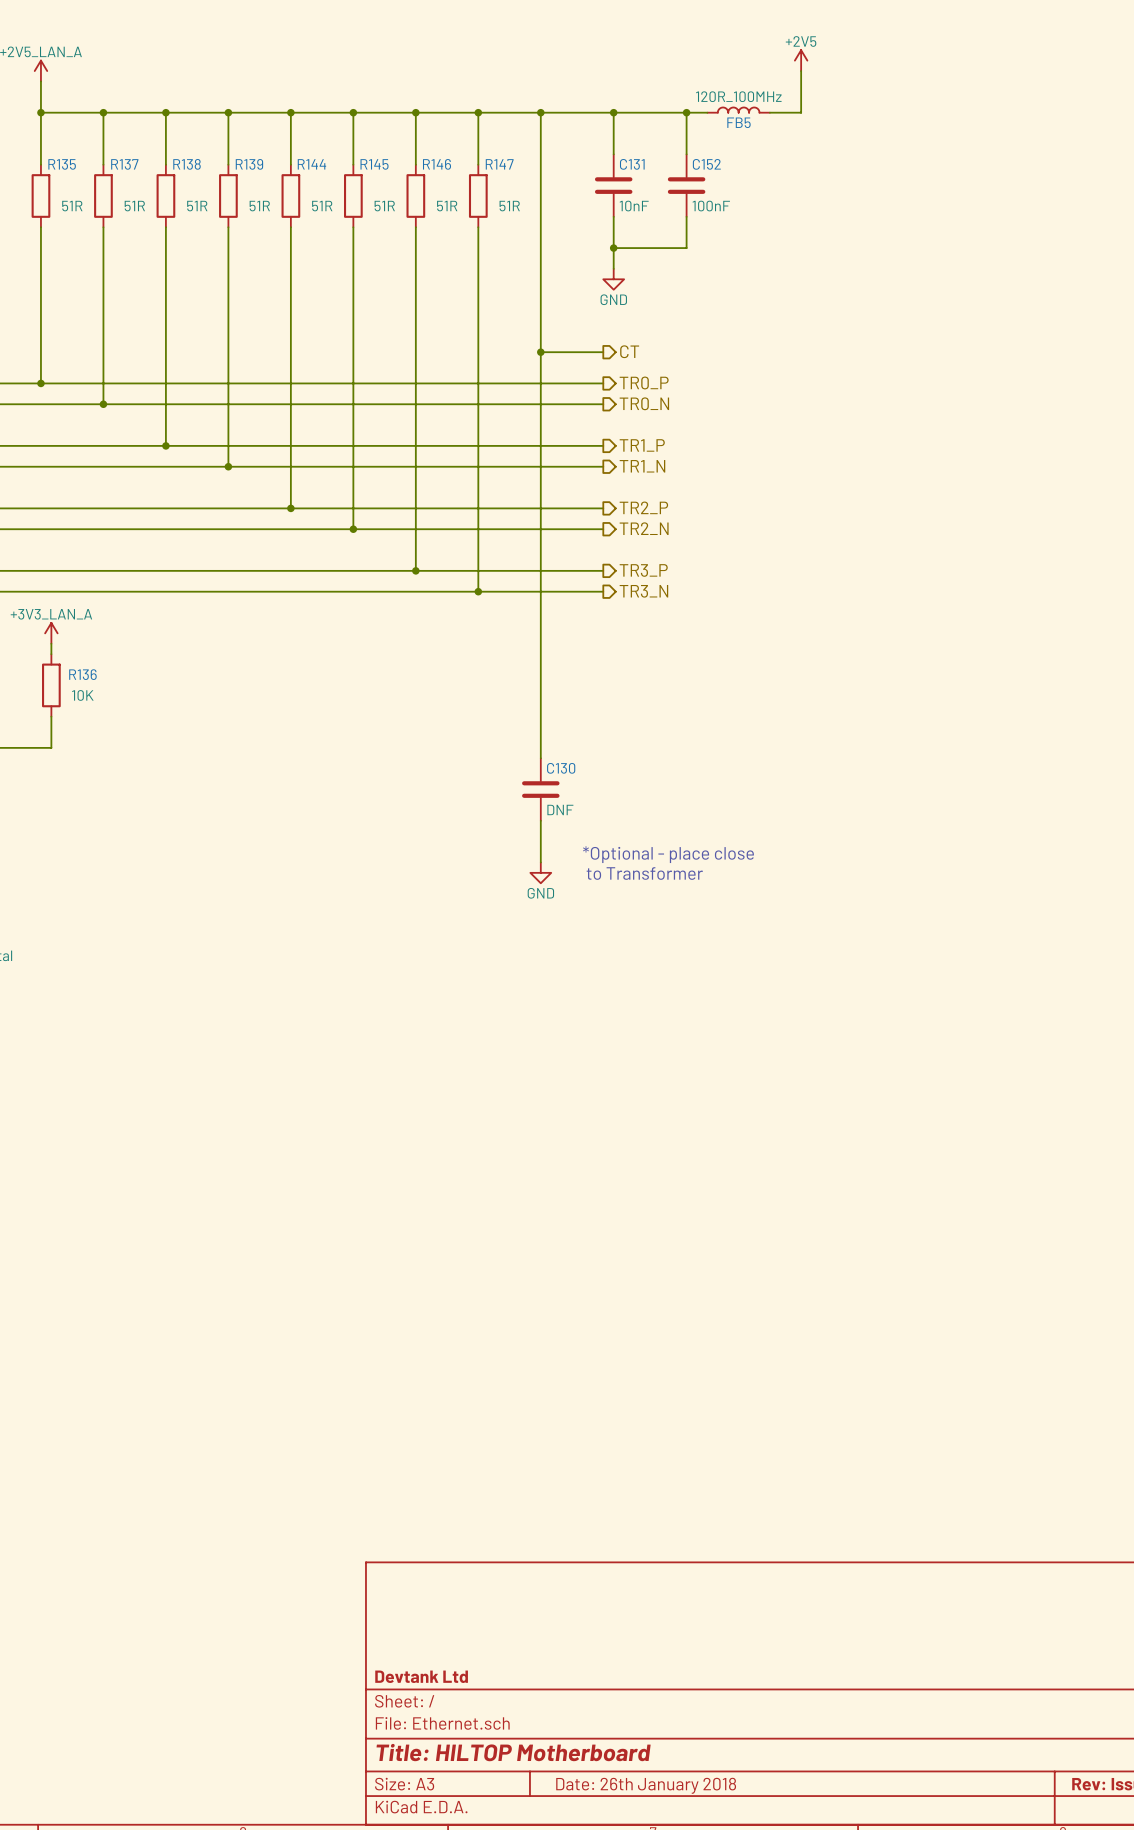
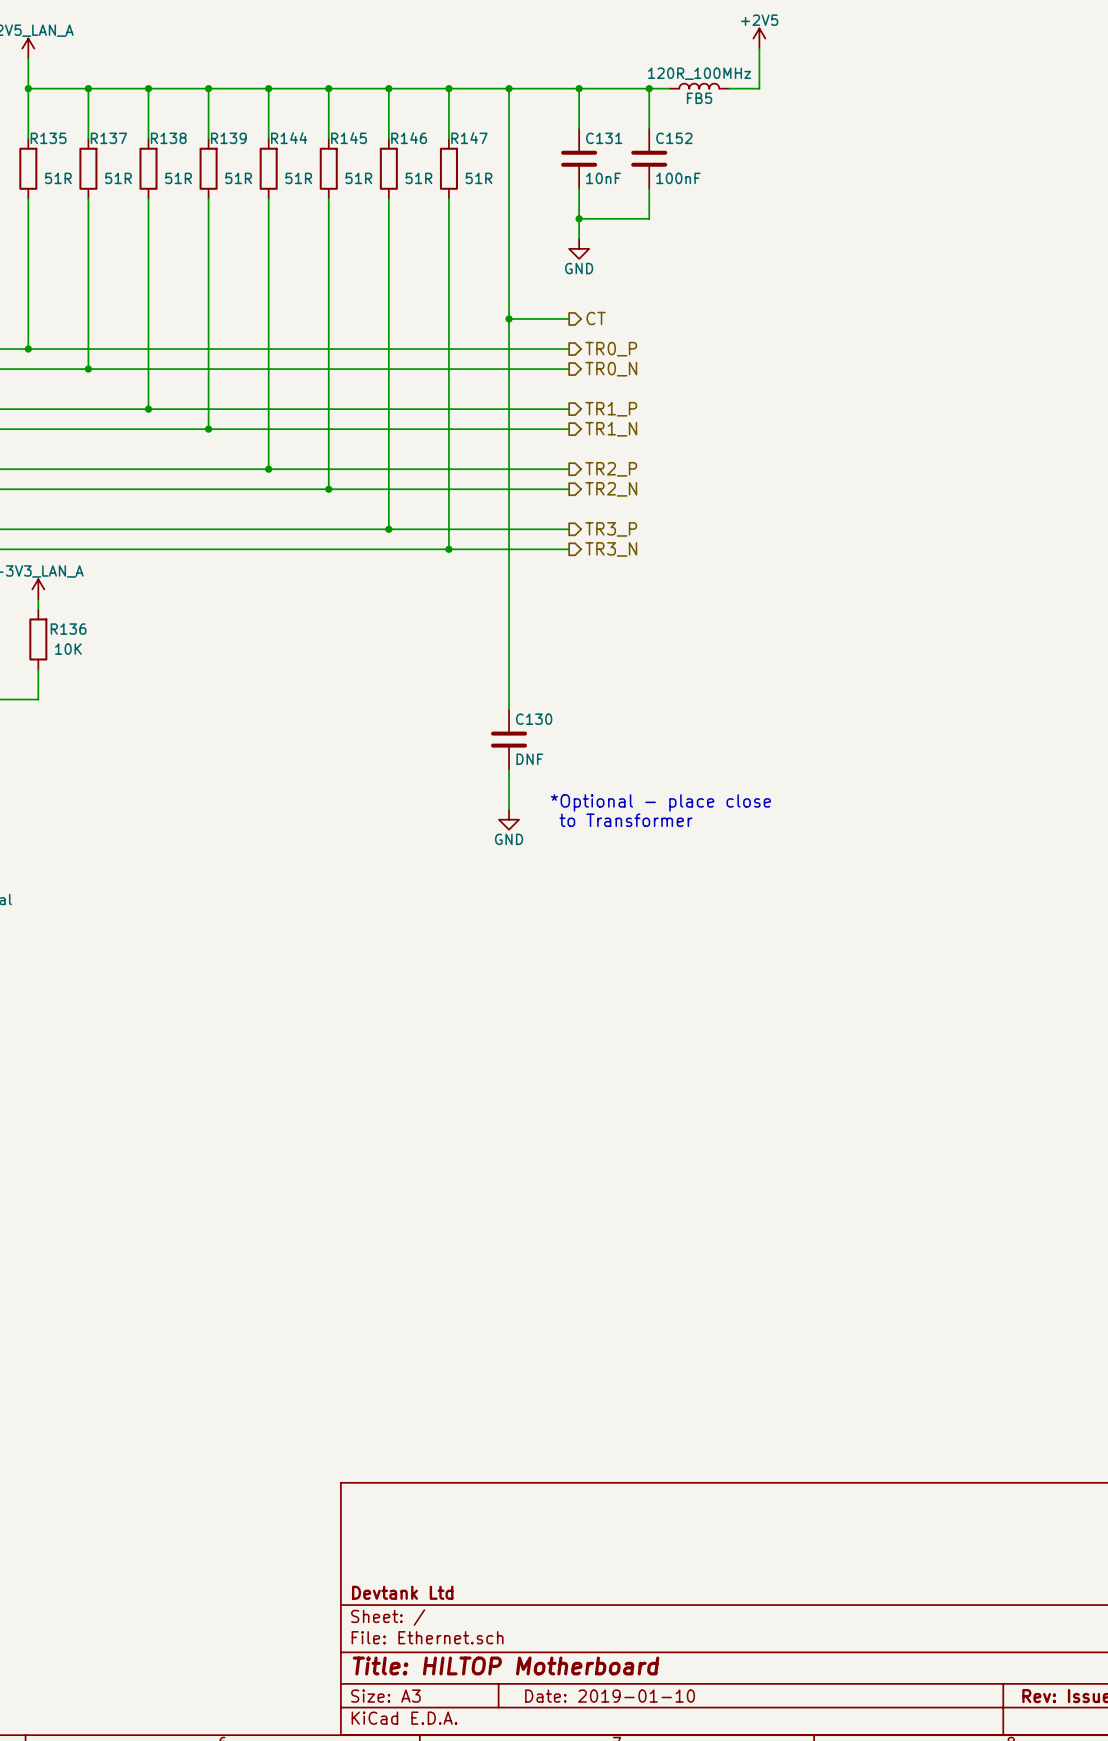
title block: Date: 26th January 2018 (646, 1785) -> Date: 2019-01-10 (610, 1696)

